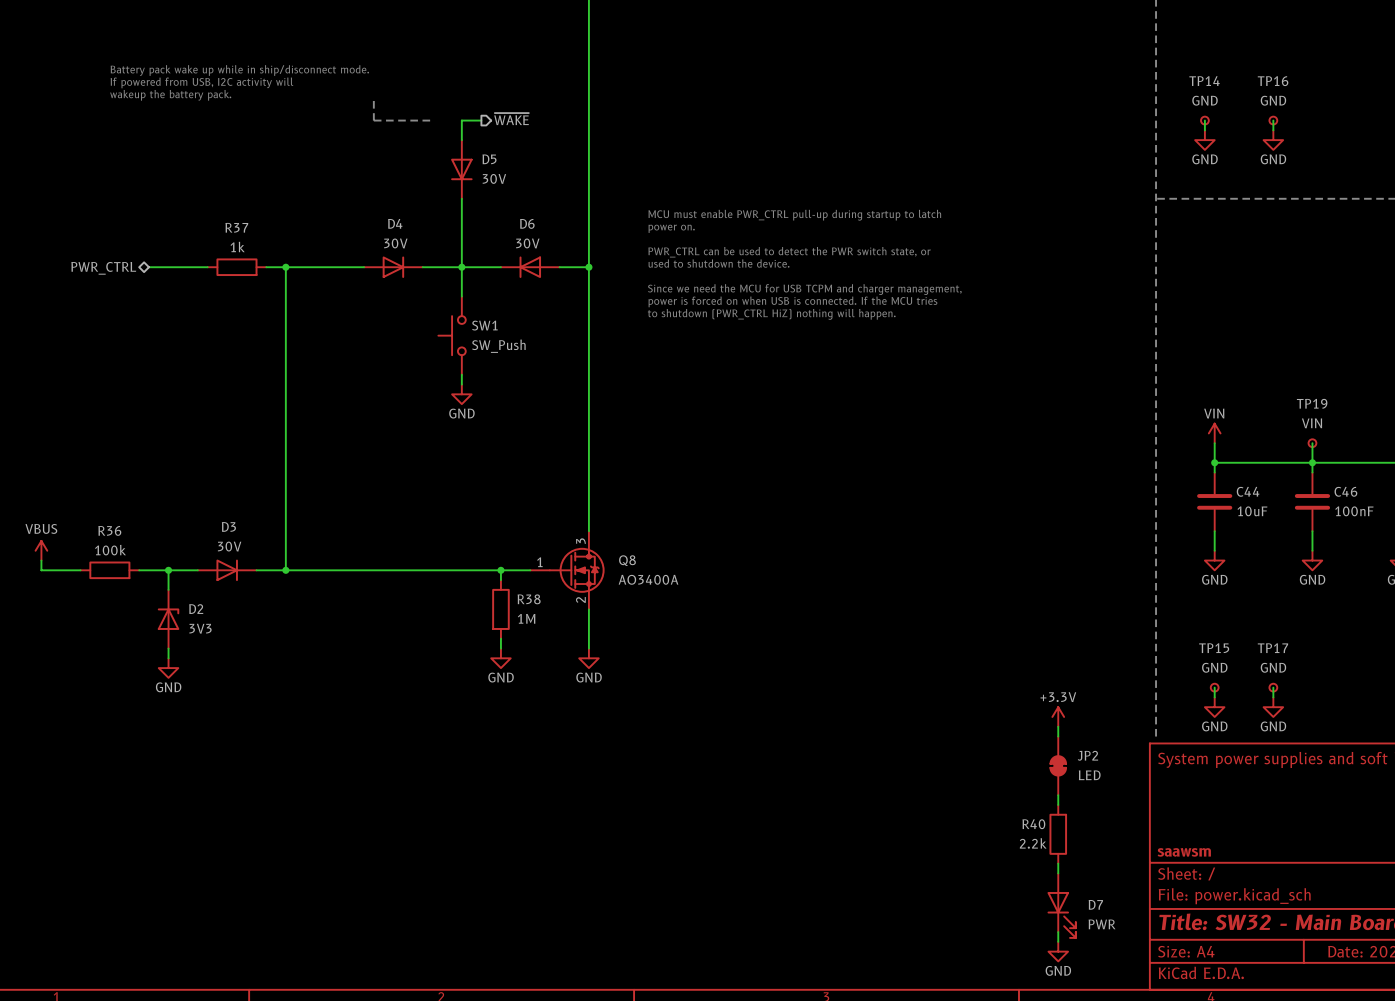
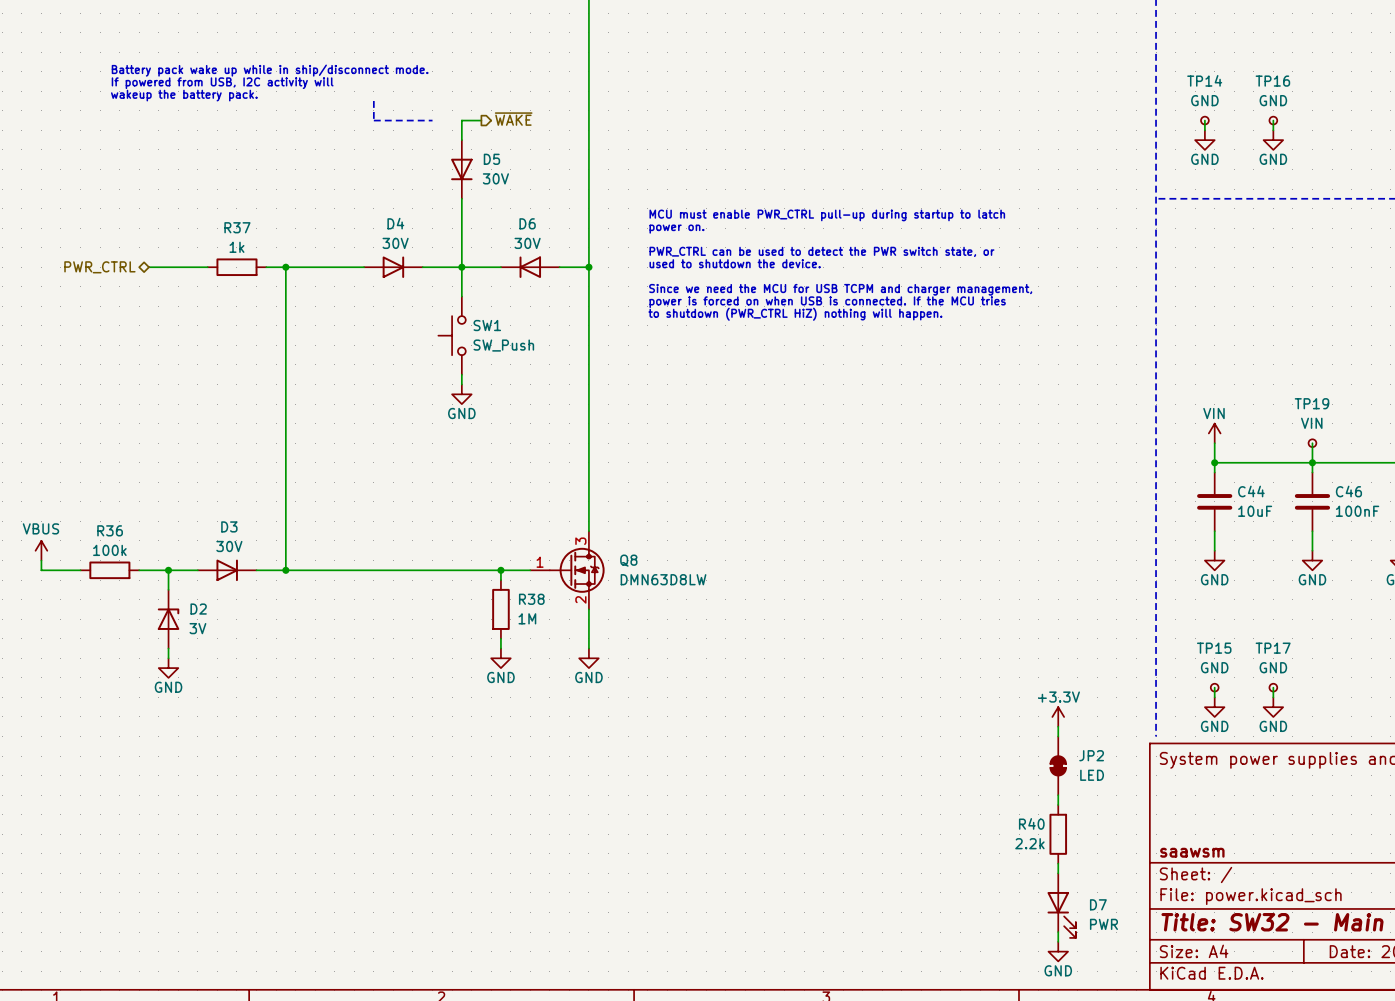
Q8 value: AO3400A (648, 579) -> DMN63D8LW (663, 579)
D2 value: 3V3 (200, 628) -> 3V (197, 628)

